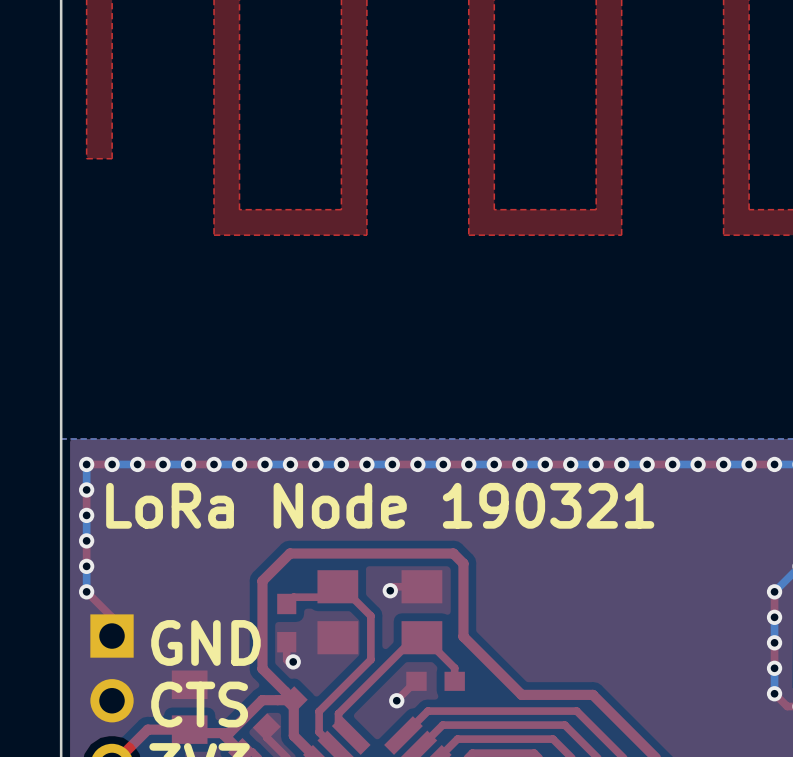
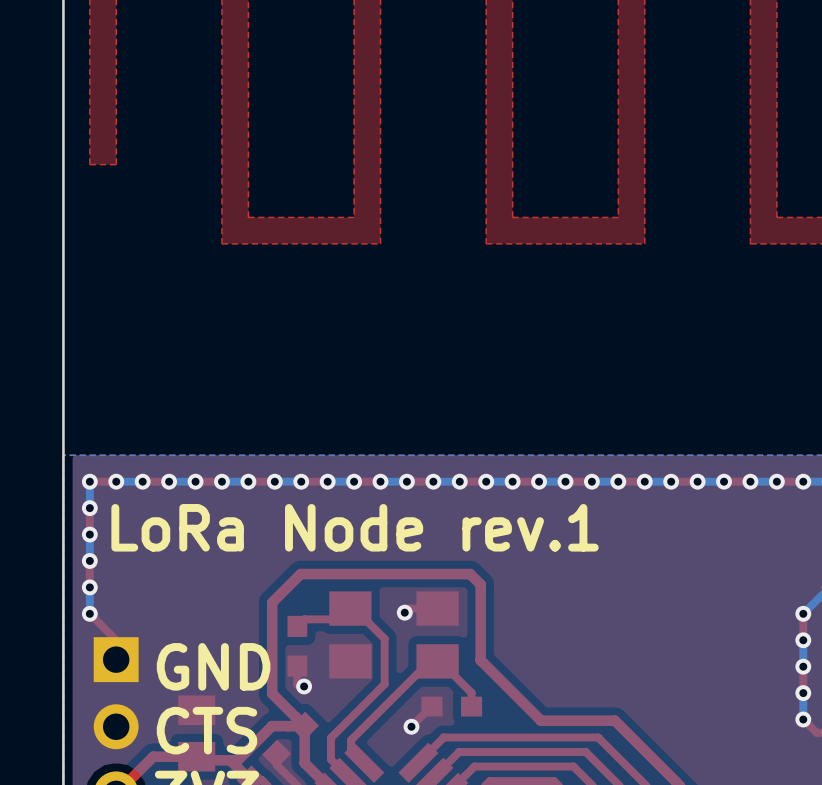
text: LoRa Node 190321 (380, 505) -> LoRa Node rev.1 (355, 527)

